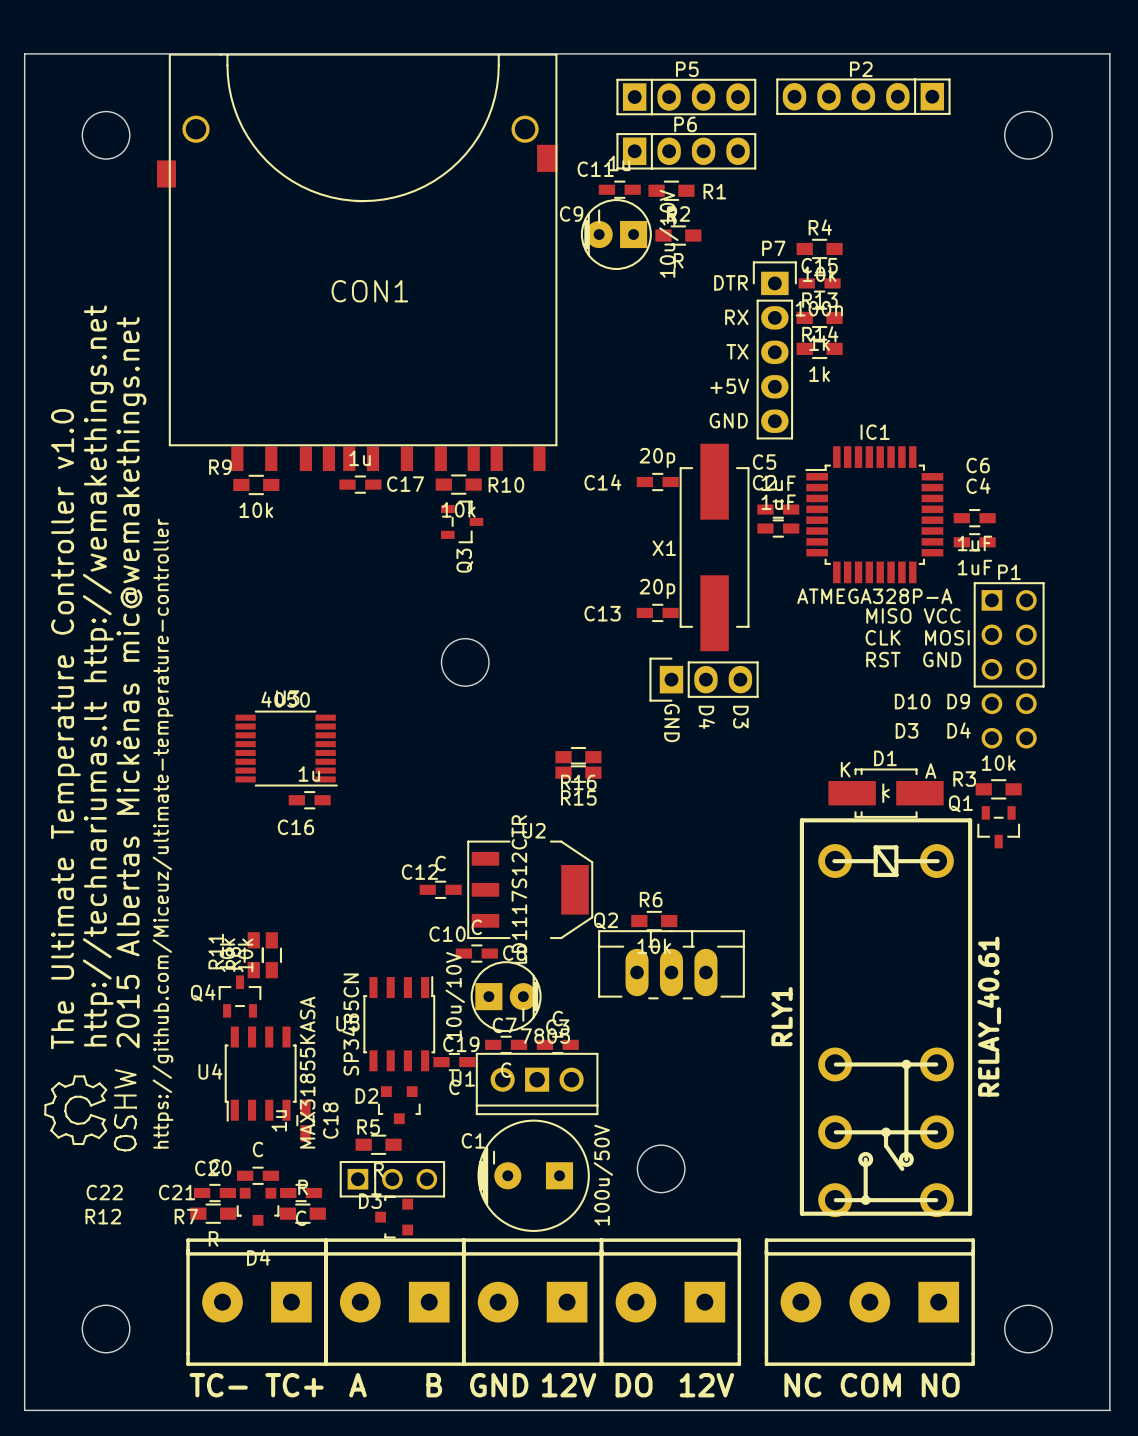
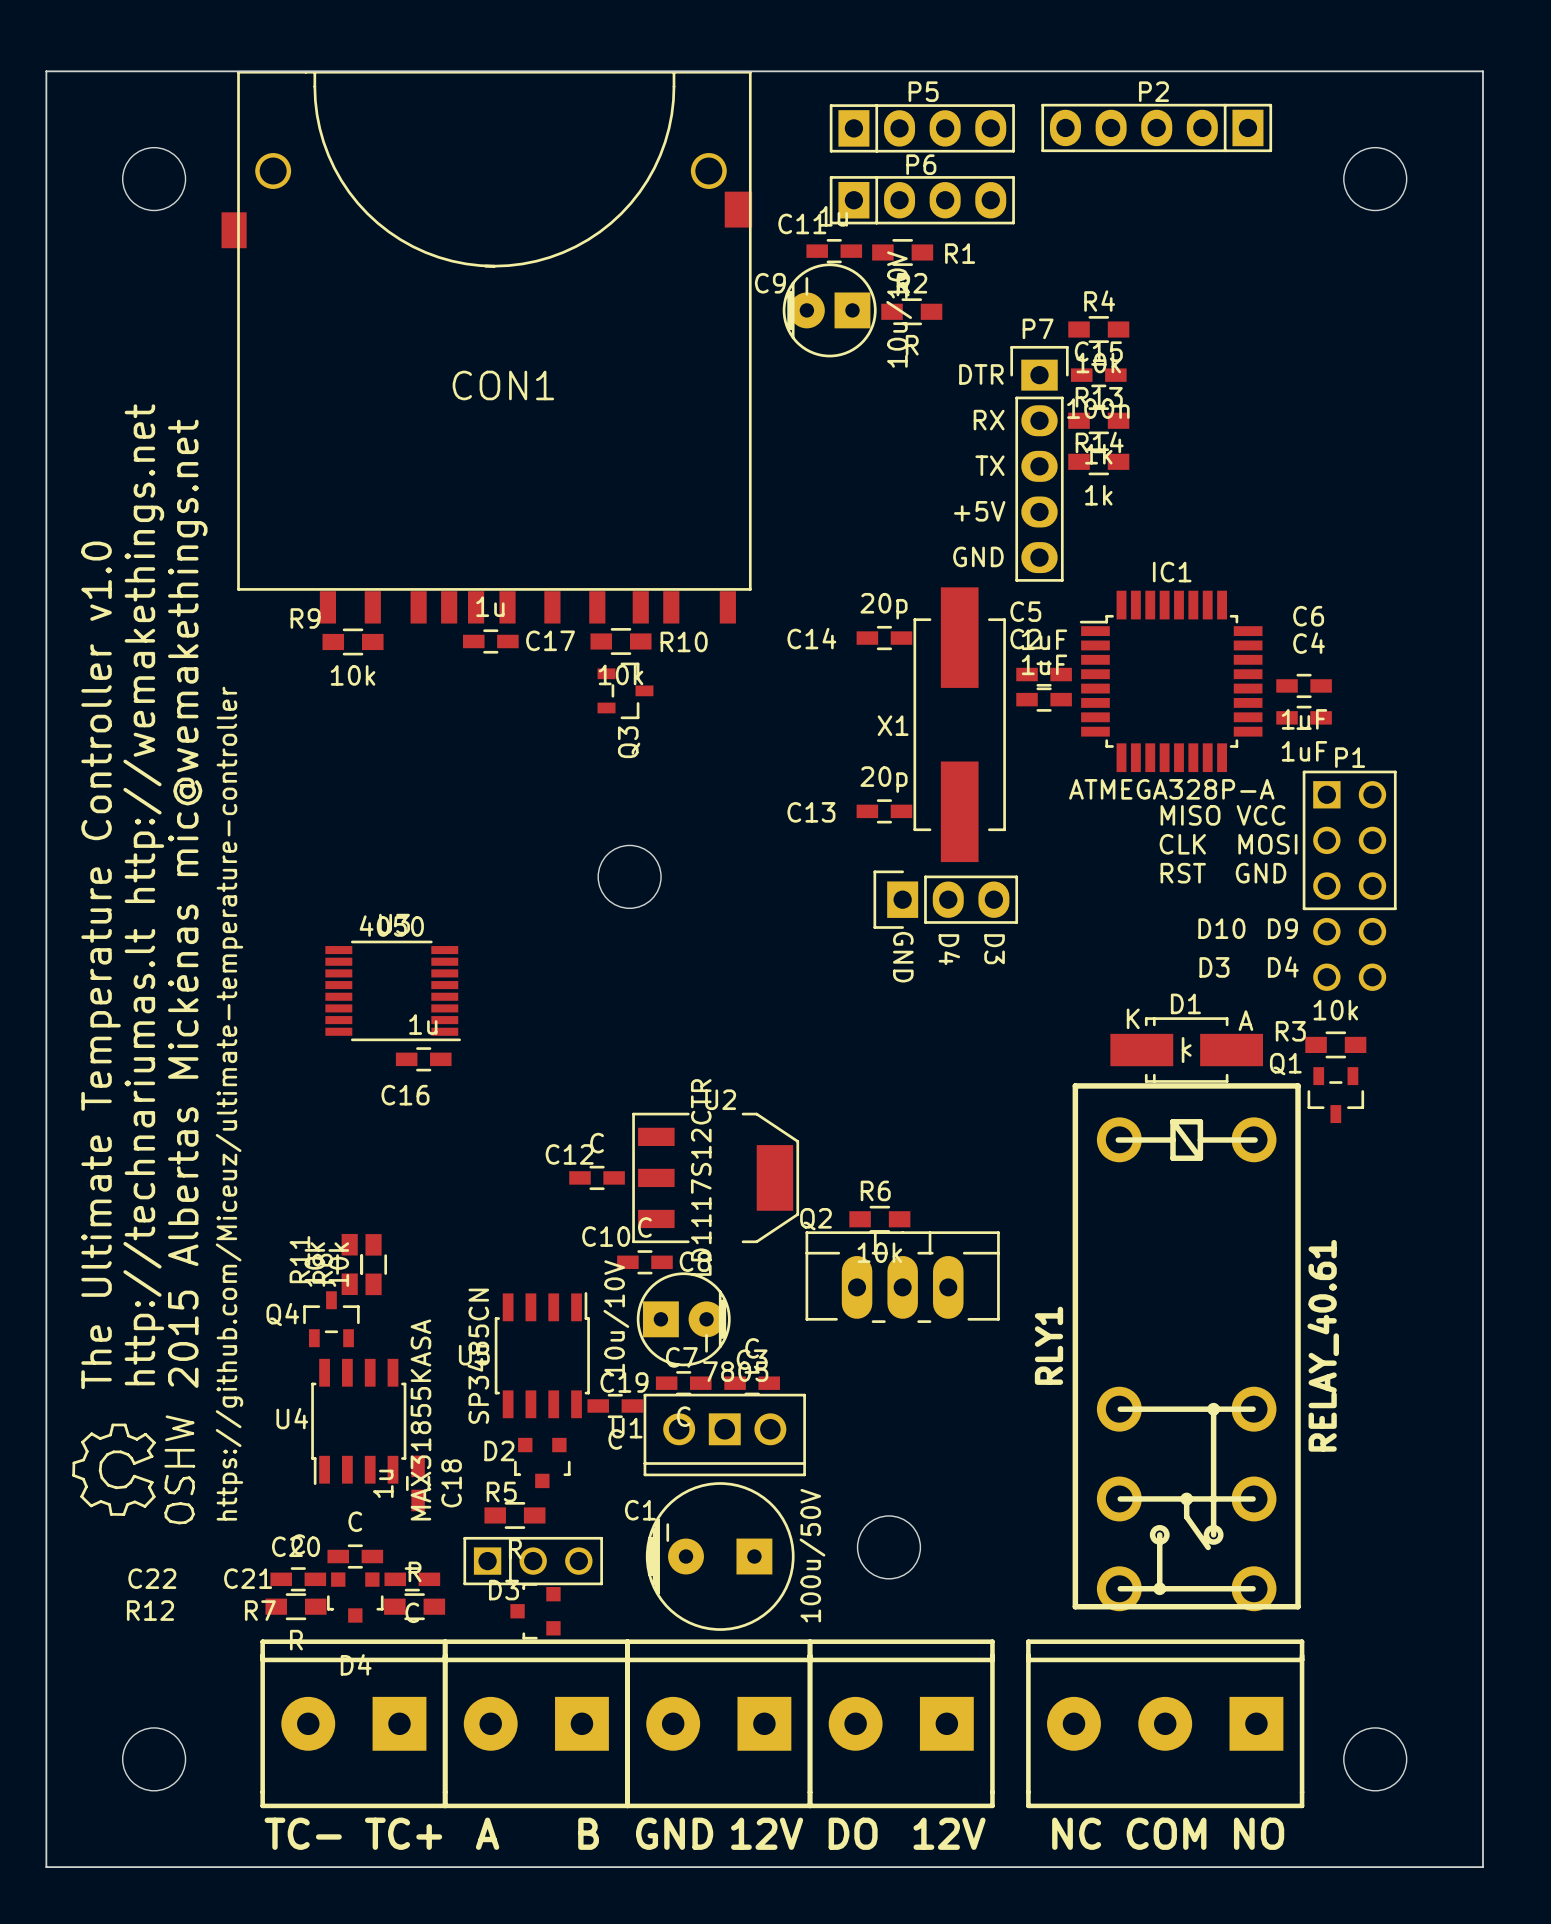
R16: (578, 757) -> none
R15: (578, 772) -> none

